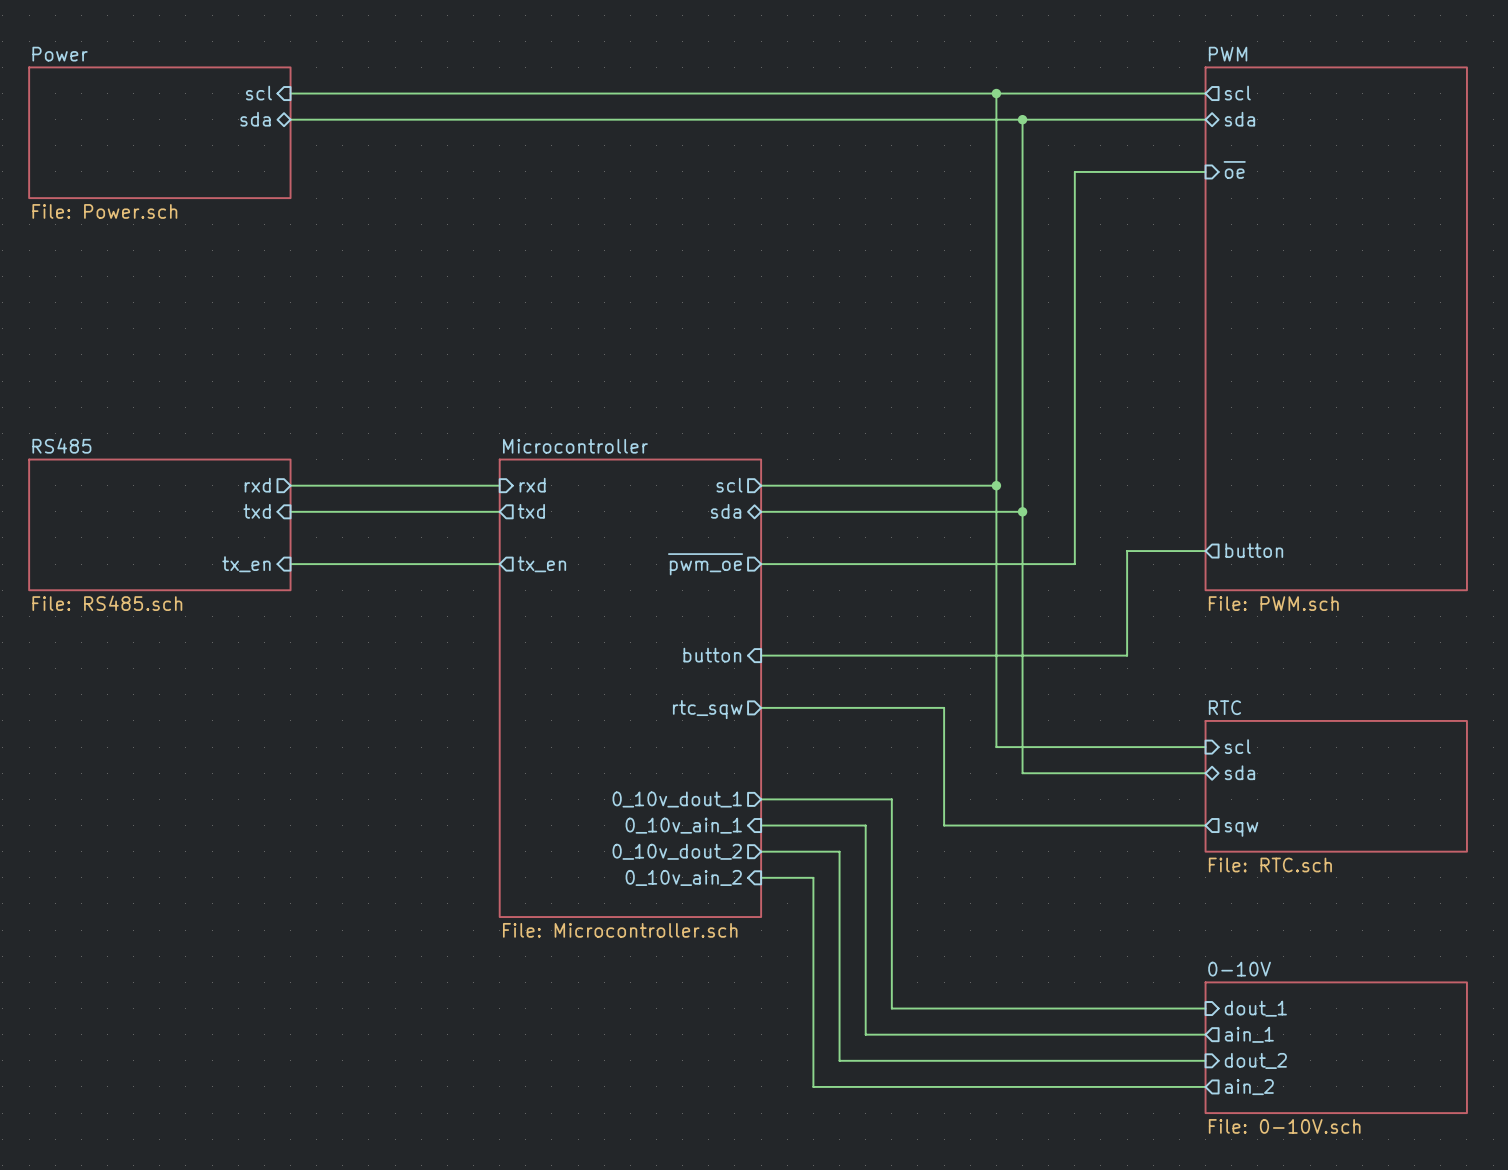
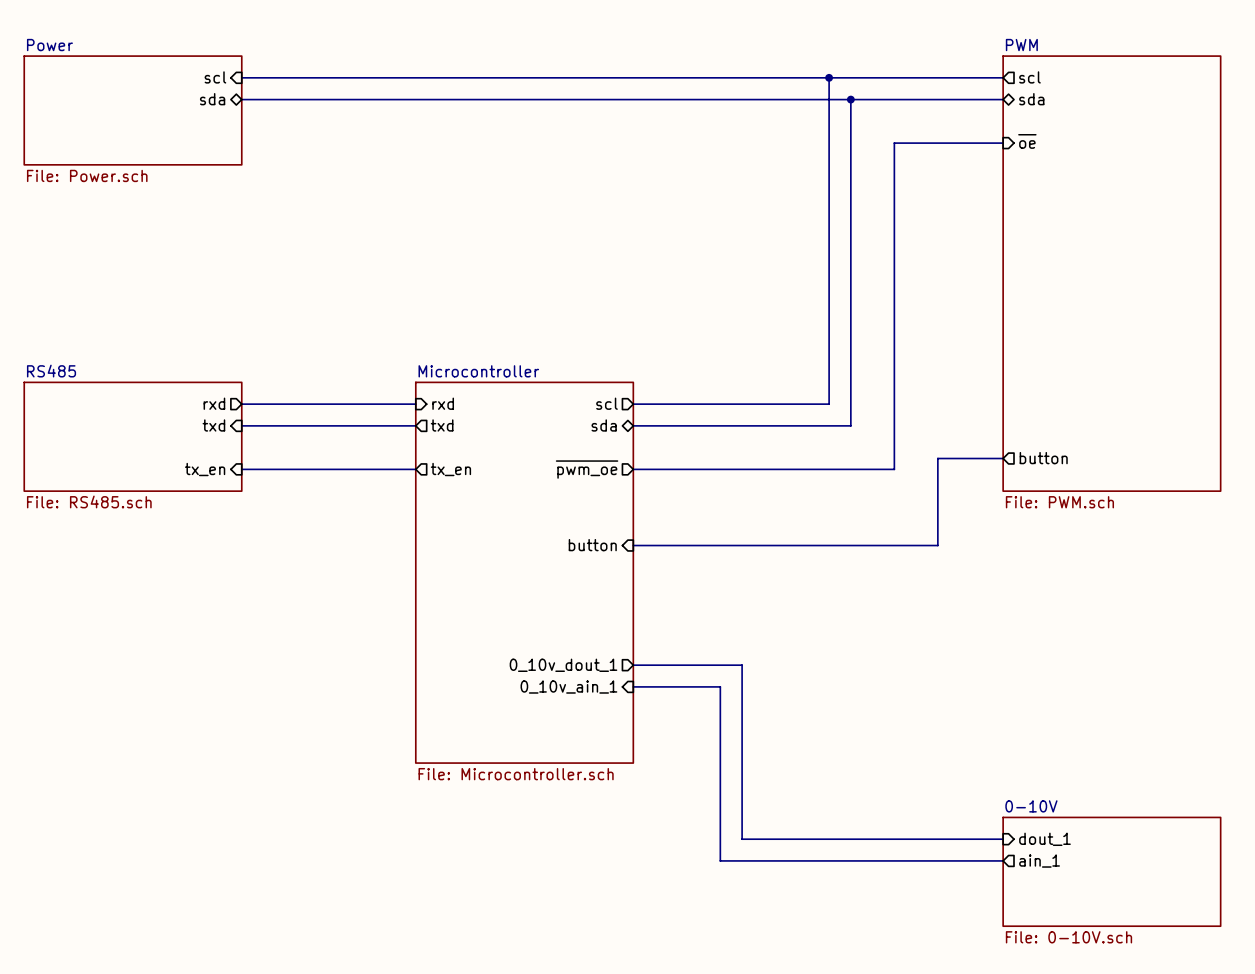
wire: (996, 485) (996, 747) (1205, 747) -> none
junction: (996, 485) -> none
wire: (1022, 511) (1022, 773) (1205, 773) -> none
junction: (1022, 511) -> none
wire: (761, 707) (944, 707) (944, 825) (1205, 825) -> none
sheet pin: rtc_sqw (707, 709) -> none
sheet pin: scl (1237, 746) -> none
sheet pin: sda (1239, 772) -> none
sheet RTC: File: RTC.sch (1336, 786) -> none
sheet pin: sqw (1241, 829) -> none
sheet pin: 0_10v_dout_2 (677, 851) -> none
wire: (761, 851) (839, 851) (839, 1060) (1205, 1060) -> none
sheet pin: 0_10v_ain_2 (683, 877) -> none
wire: (761, 877) (813, 877) (813, 1086) (1205, 1086) -> none
sheet pin: dout_2 (1255, 1060) -> none
sheet pin: ain_2 (1249, 1087) -> none

